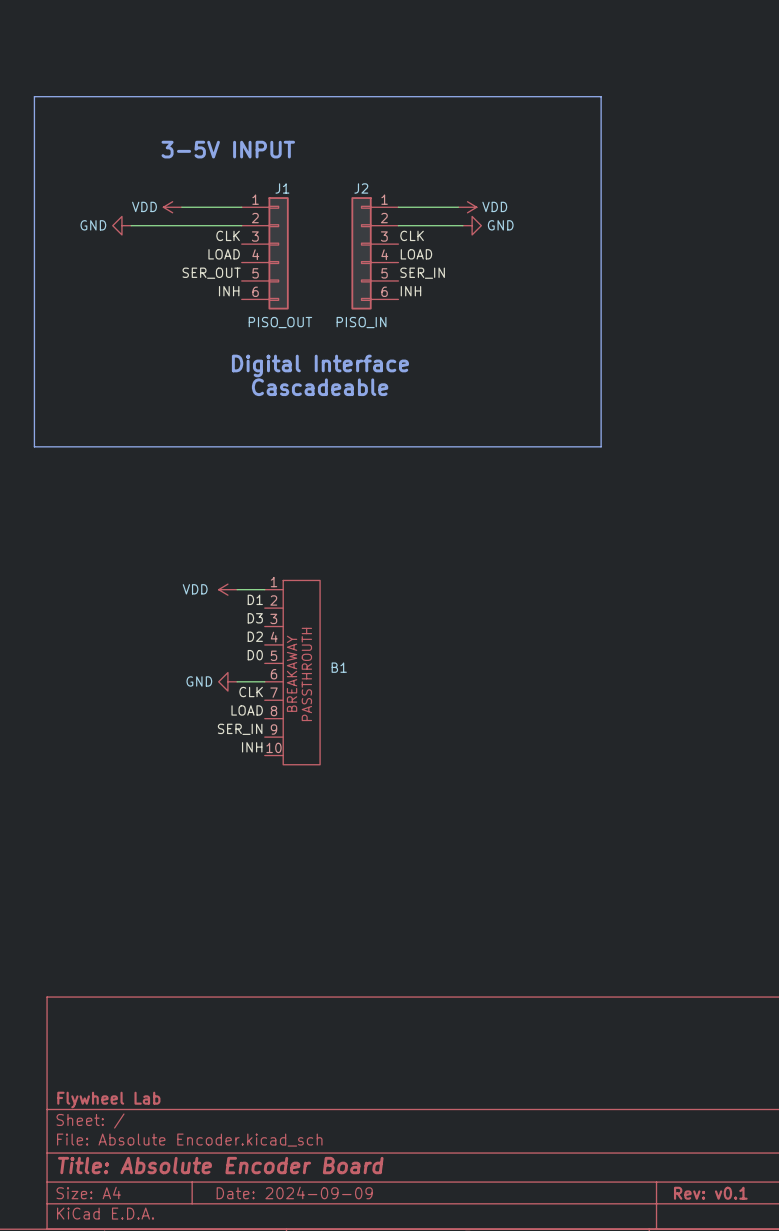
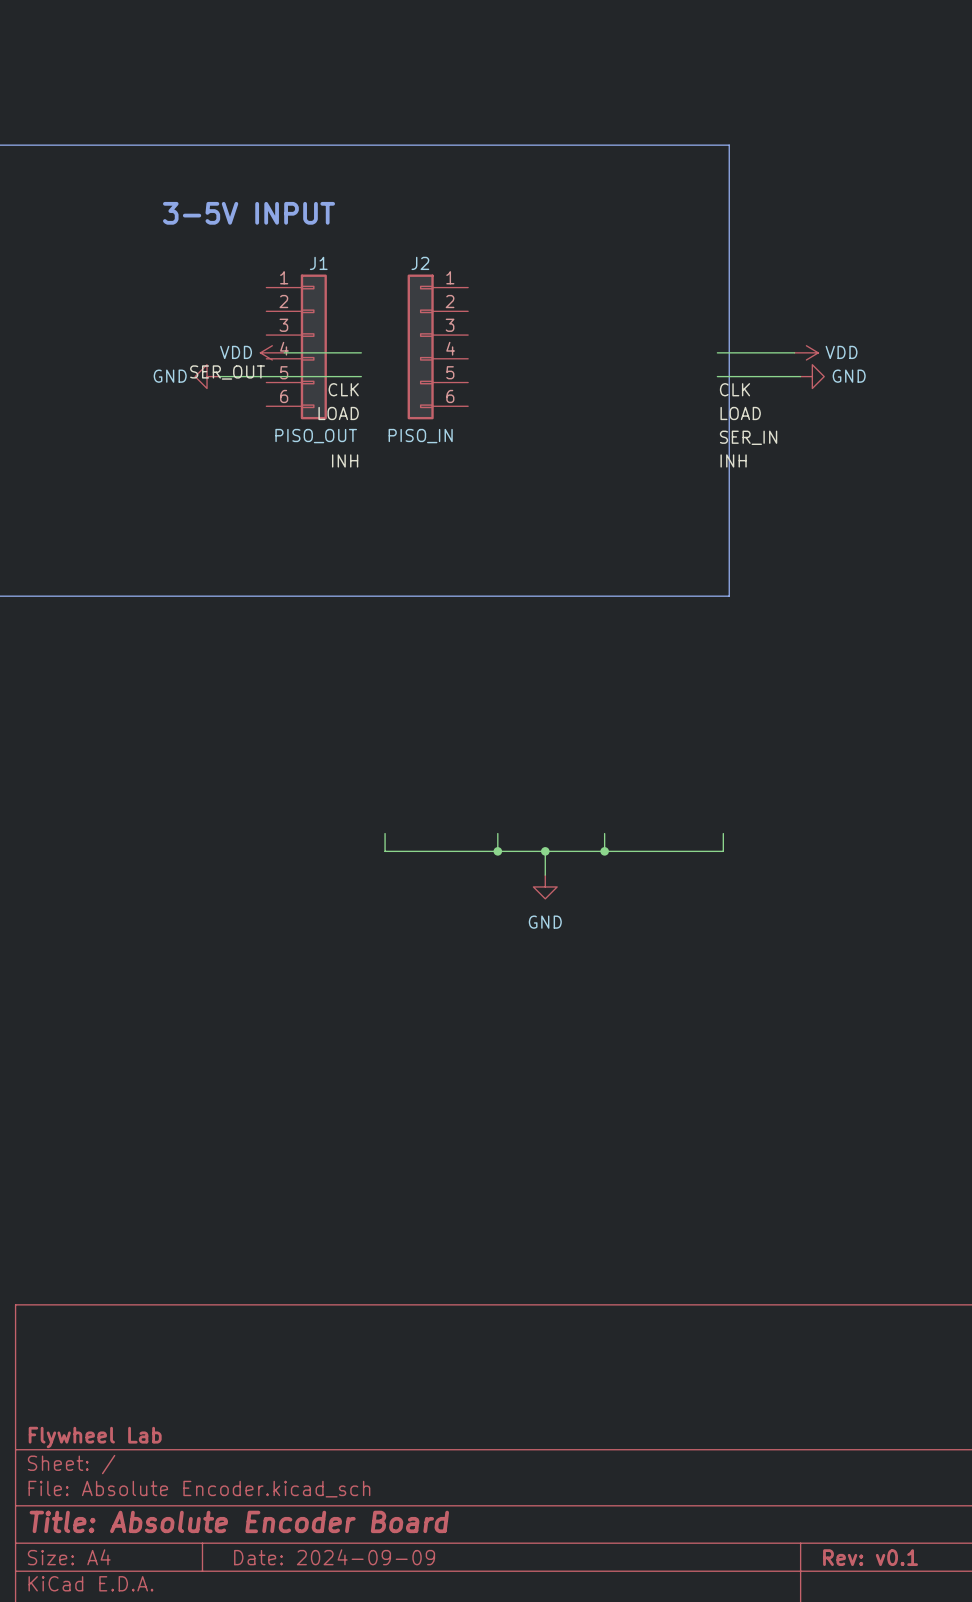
power symbol position: VDD (172, 207) -> VDD (272, 352)
wire: (181, 207) (241, 207) -> (284, 352) (361, 352)
wire: (398, 207) (458, 207) -> none
power symbol: VDD (467, 207) -> none
power symbol position: GND (121, 225) -> GND (207, 376)
wire: (131, 225) (241, 225) -> (218, 376) (361, 376)
wire: (398, 225) (462, 225) -> none
power symbol: GND (472, 225) -> none
label: CLK (228, 235) -> none
label: CLK (412, 235) -> none
label: LOAD (224, 254) -> none
label: LOAD (416, 254) -> none
wire: none -> (717, 352) (794, 352)
power symbol: none -> VDD (806, 352)
label: SER_IN (422, 273) -> none
wire: none -> (717, 376) (800, 376)
power symbol: none -> GND (812, 376)
label: none -> CLK (343, 389)
label: none -> CLK (735, 389)
label: INH (229, 291) -> none
label: INH (410, 291) -> none
label: none -> LOAD (338, 413)
label: none -> LOAD (740, 413)
label: none -> SER_IN (748, 437)
label: none -> INH (345, 460)
label: none -> INH (733, 460)
text: Digital Interface (320, 365) -> none
text: Cascadeable (320, 387) -> none
power symbol: VDD (227, 589) -> none
wire: (237, 589) (264, 589) -> none
label: D1 (255, 599) -> none
label: D3 (255, 618) -> none
wire: none -> (385, 833) (385, 851) (723, 851) (723, 833)
wire: none -> (497, 833) (497, 851)
wire: none -> (604, 833) (604, 851)
label: D2 (255, 636) -> none
junction: none -> (497, 851)
wire: none -> (545, 851) (545, 875)
junction: none -> (545, 851)
junction: none -> (604, 851)
label: D0 (255, 655) -> none
B1: (292, 672) -> none
power symbol: none -> GND (545, 886)
power symbol: GND (227, 681) -> none
wire: (237, 681) (264, 681) -> none
label: CLK (251, 692) -> none
label: LOAD (247, 710) -> none
label: SER_IN (240, 729) -> none
label: INH (252, 747) -> none

